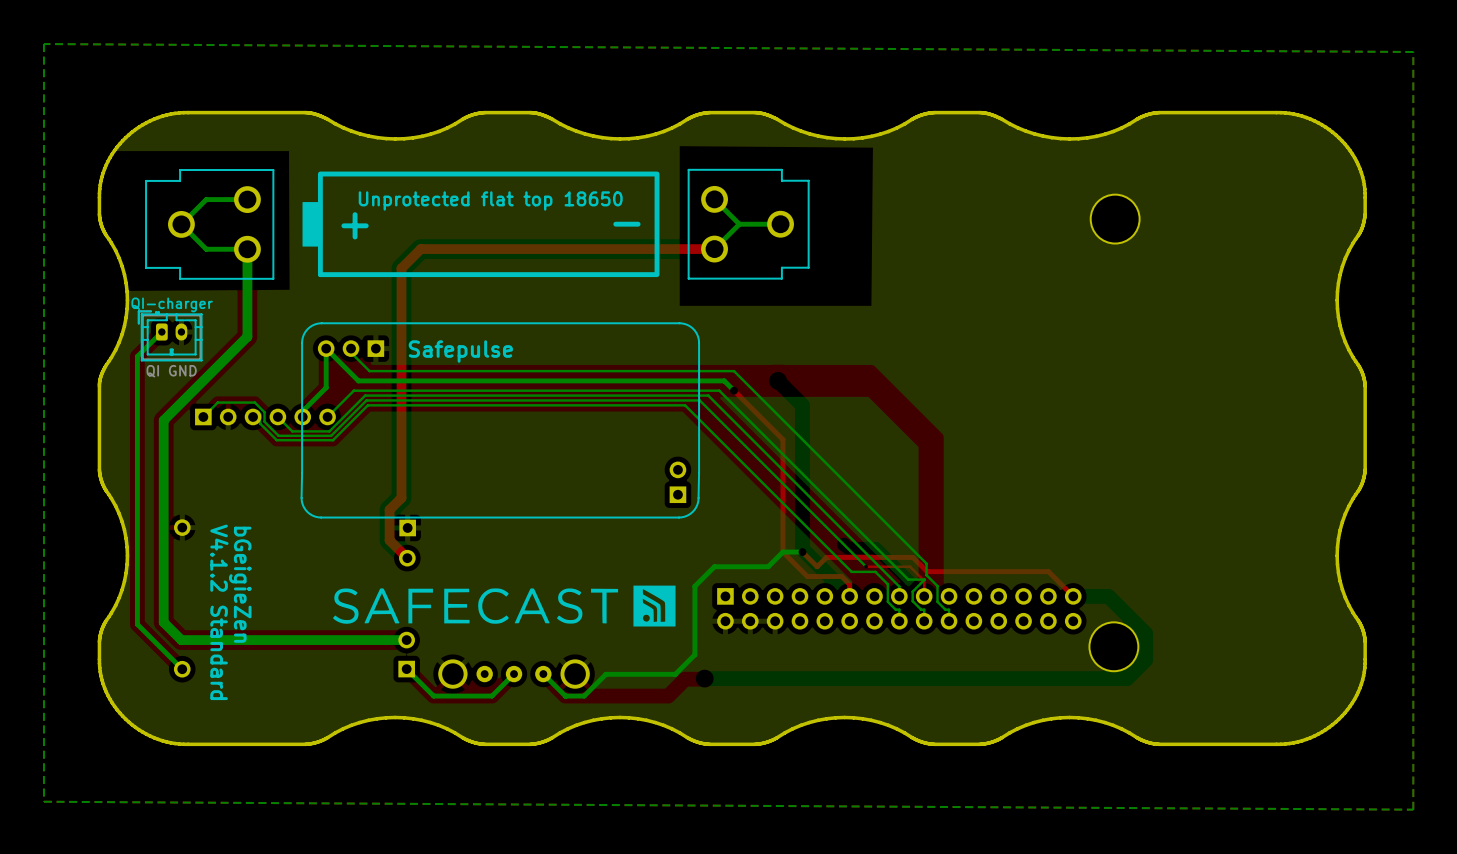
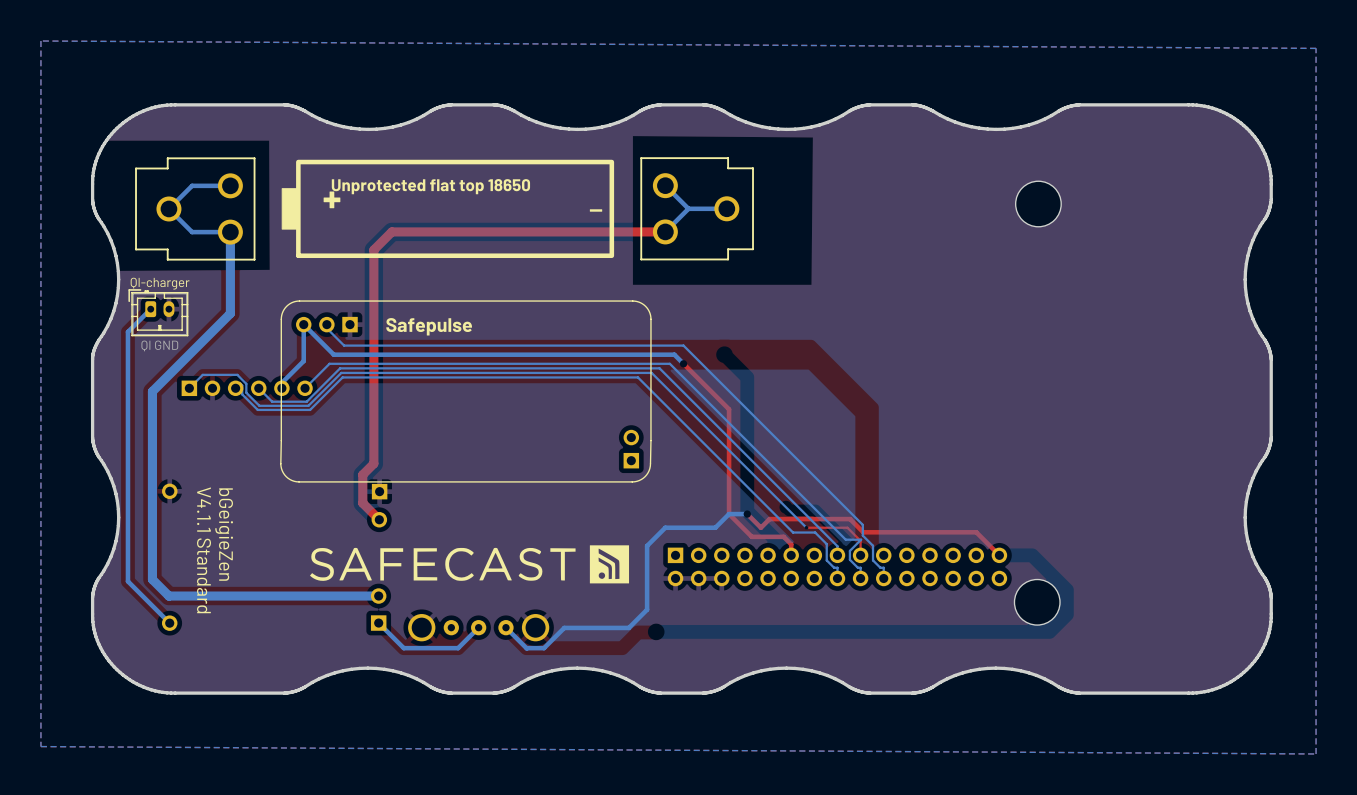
text: V4.1.2 Standard (219, 612) -> V4.1.1 Standard (204, 550)

